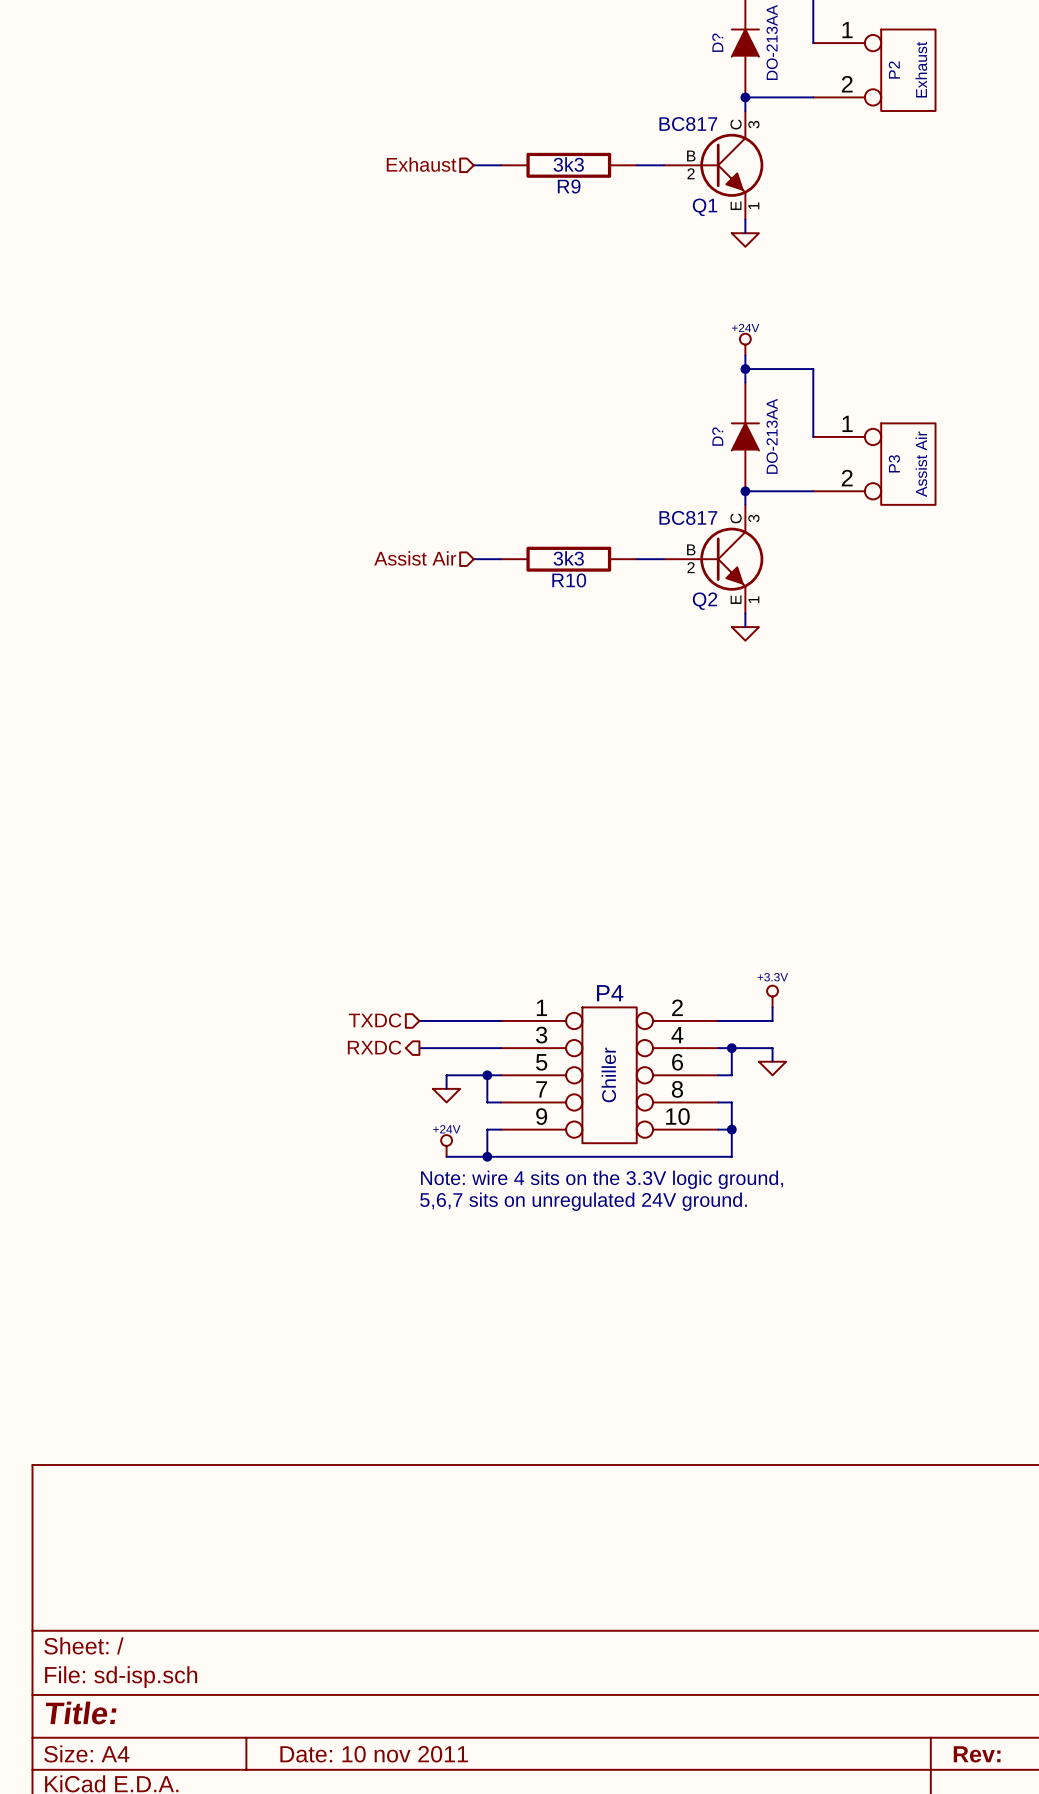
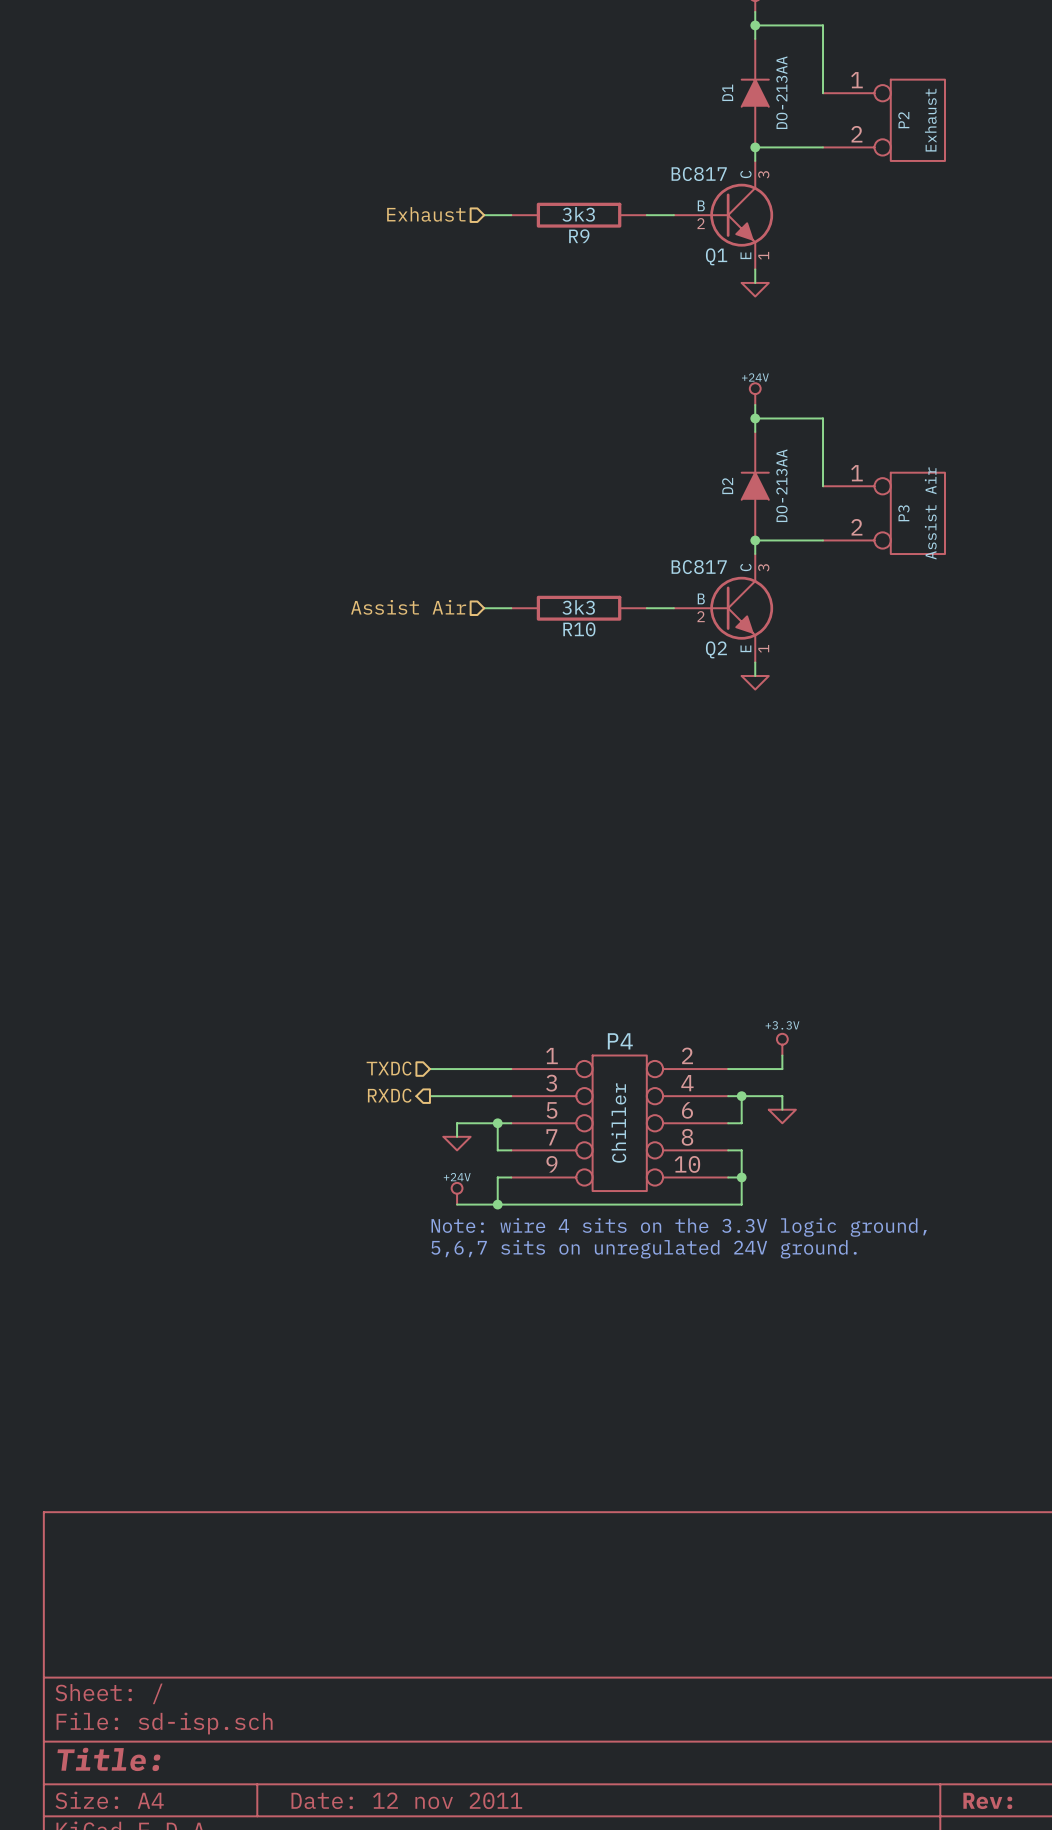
D? name: D? (717, 42) -> D1 (727, 92)
D? name: D? (717, 436) -> D2 (727, 486)
title block: Date: 10 nov 2011 (374, 1754) -> Date: 12 nov 2011 (406, 1800)

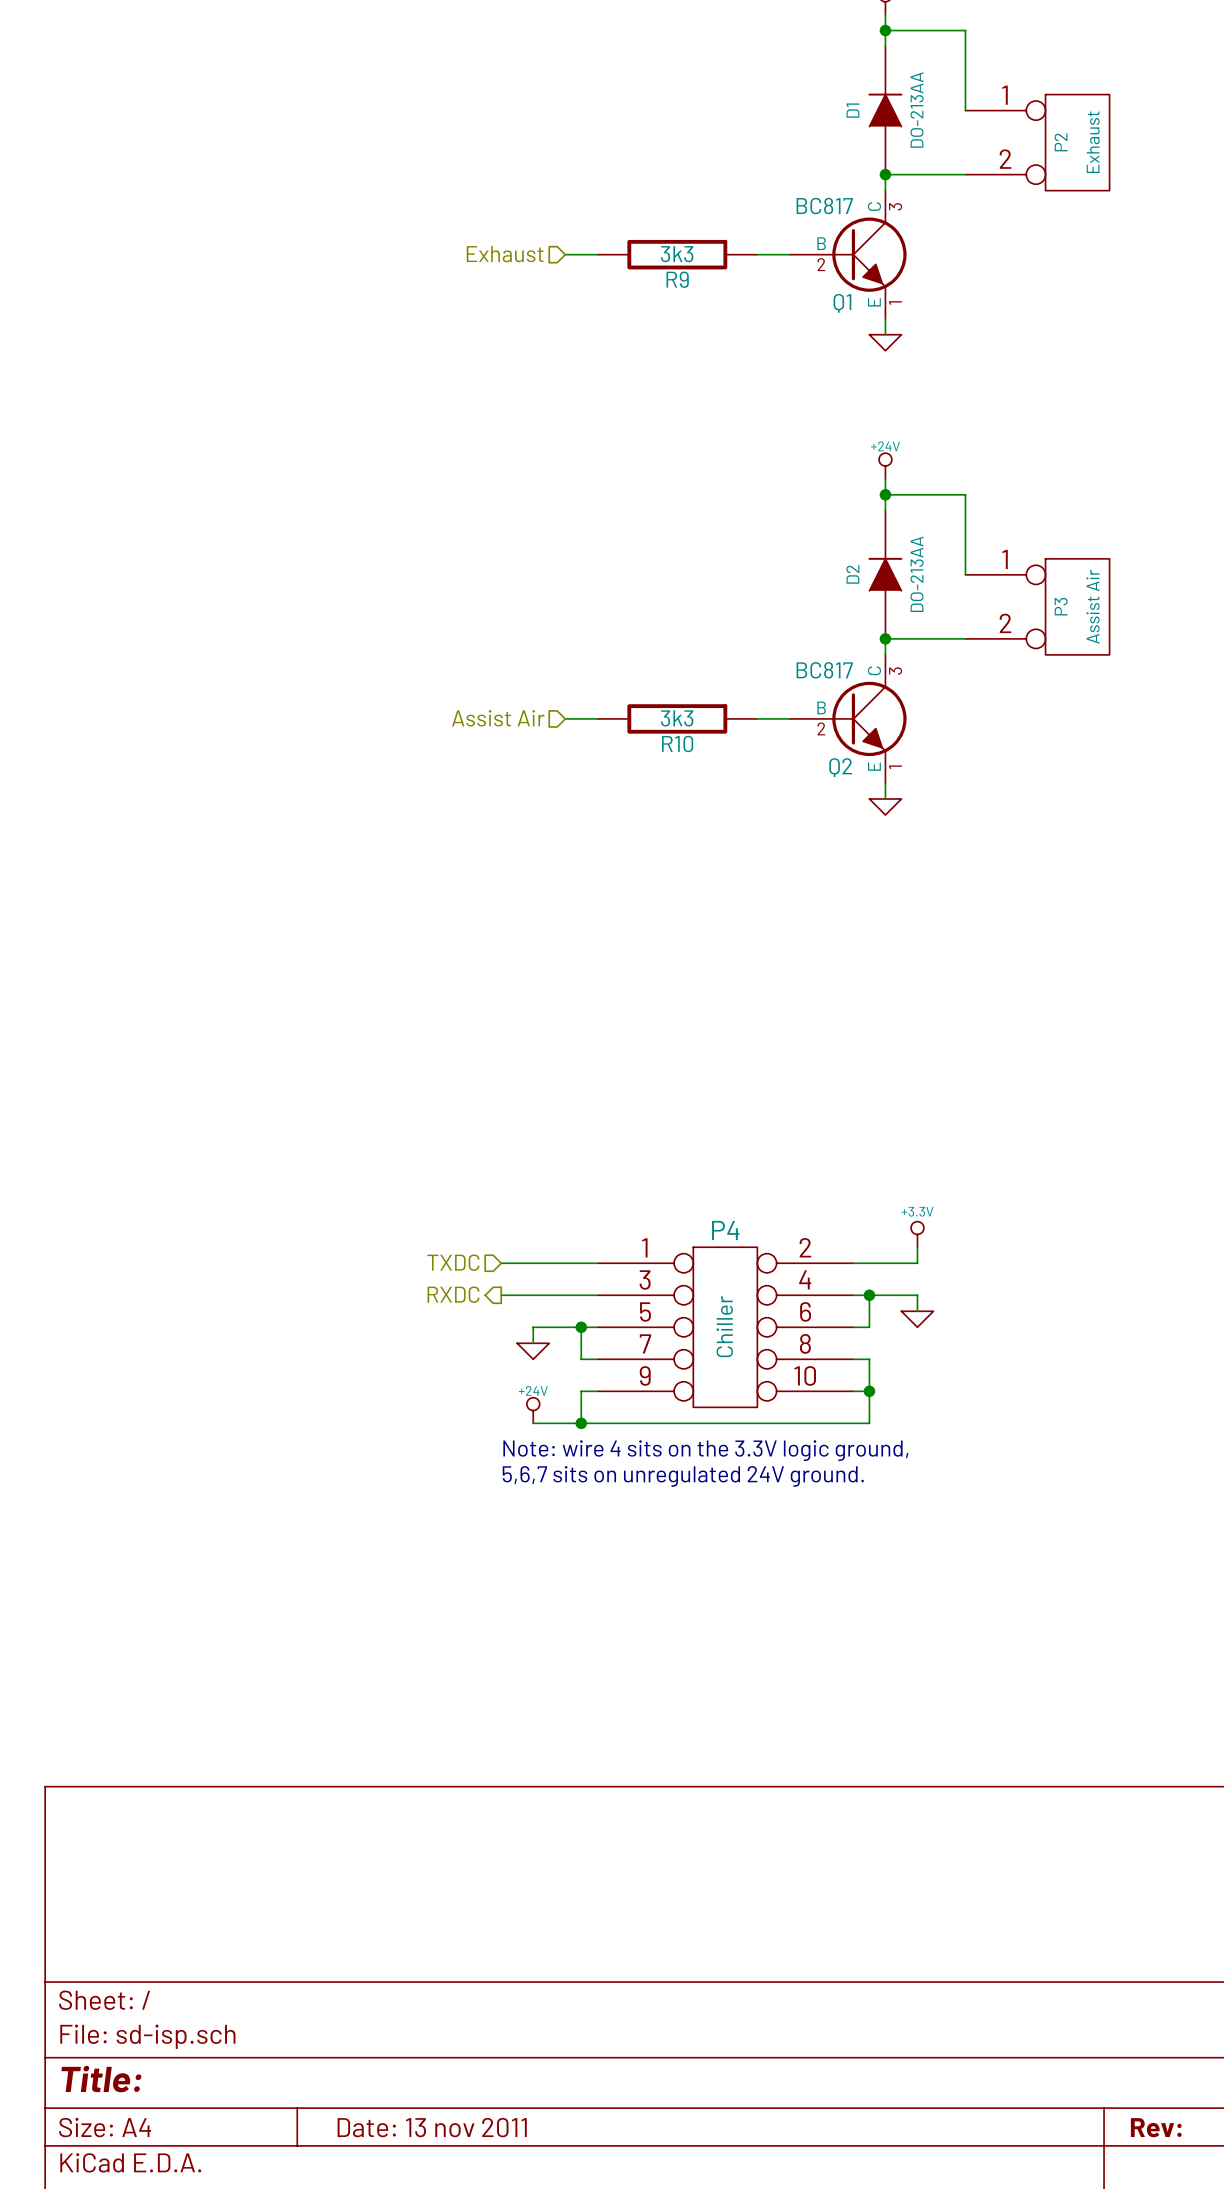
title block: Date: 12 nov 2011 (406, 1800) -> Date: 13 nov 2011 (432, 2127)

